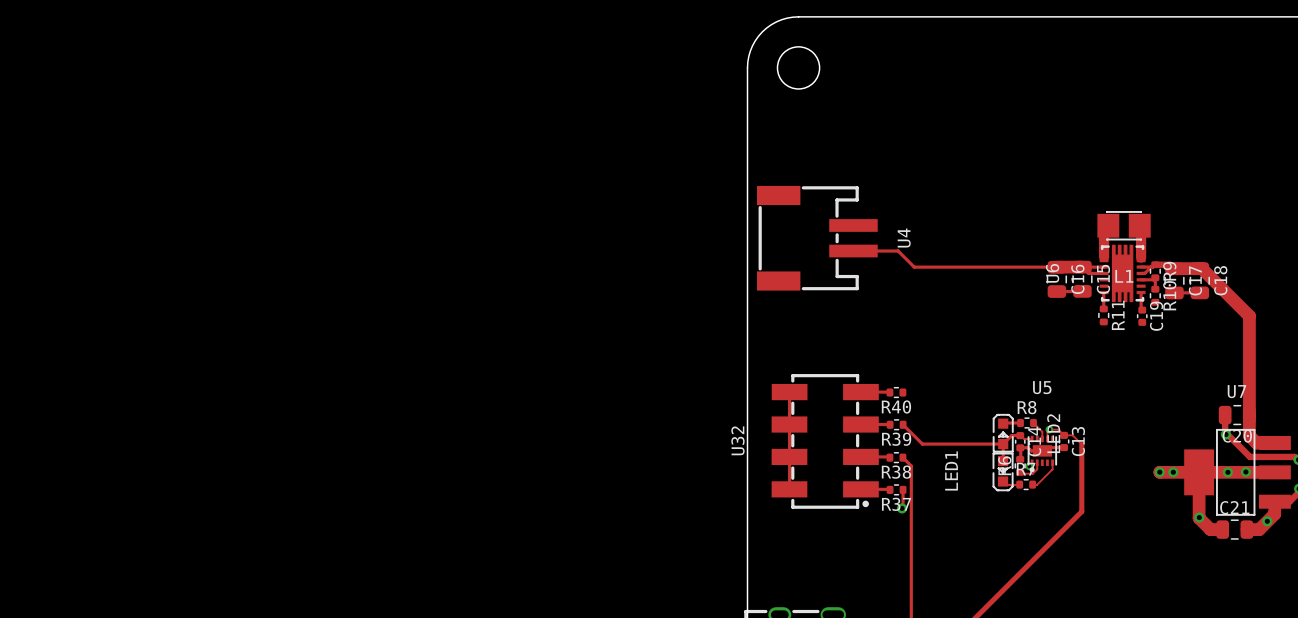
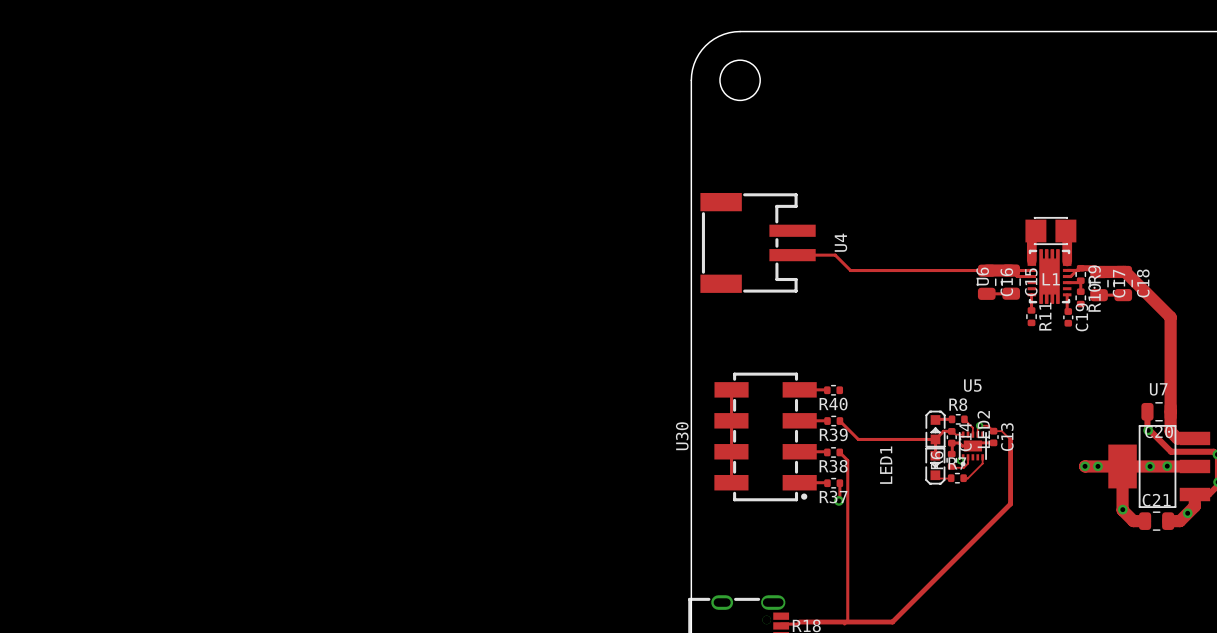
U32 name: U32 (737, 440) -> U30 (682, 436)

